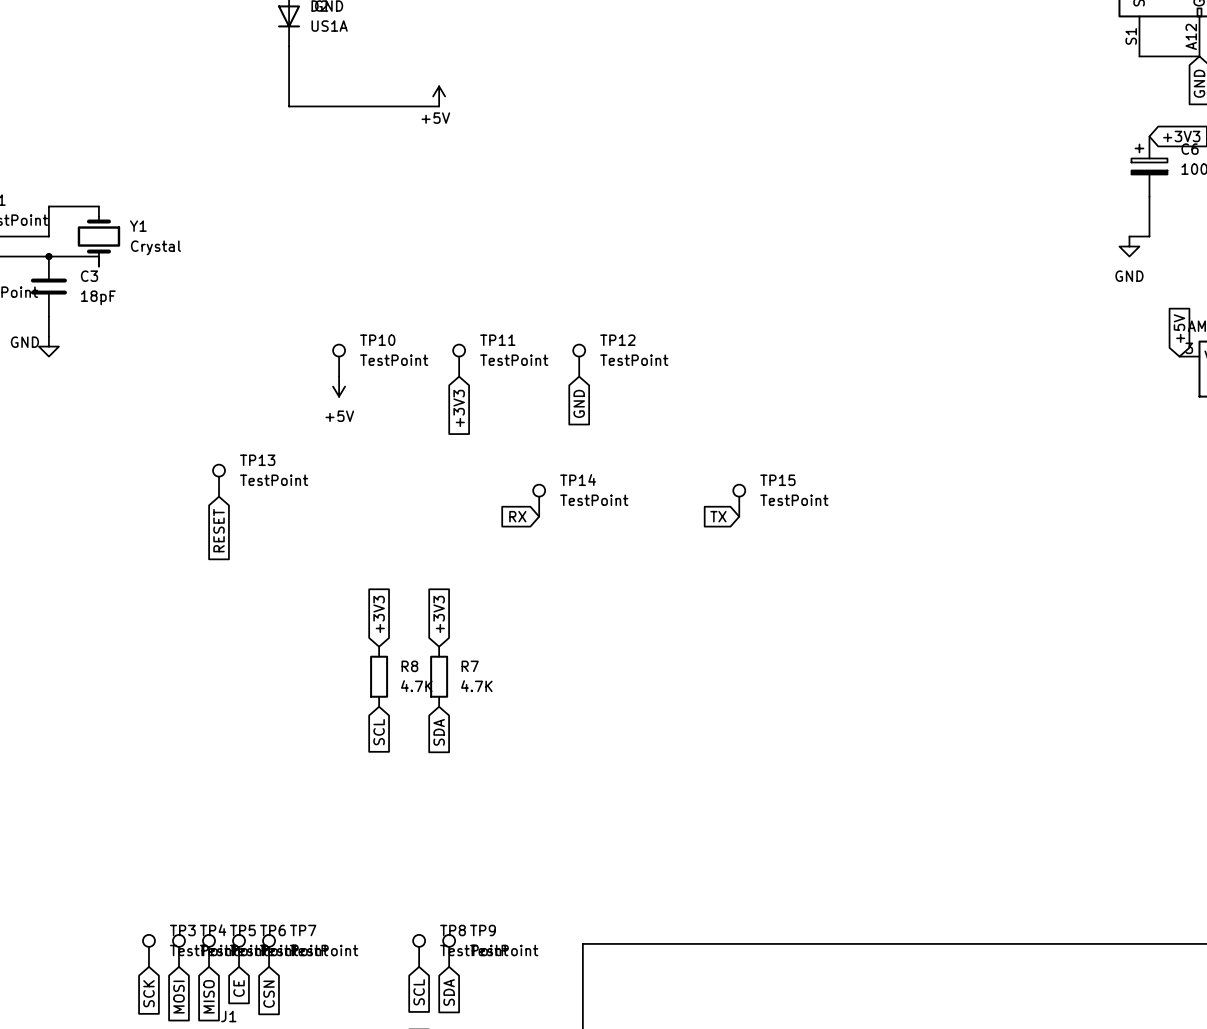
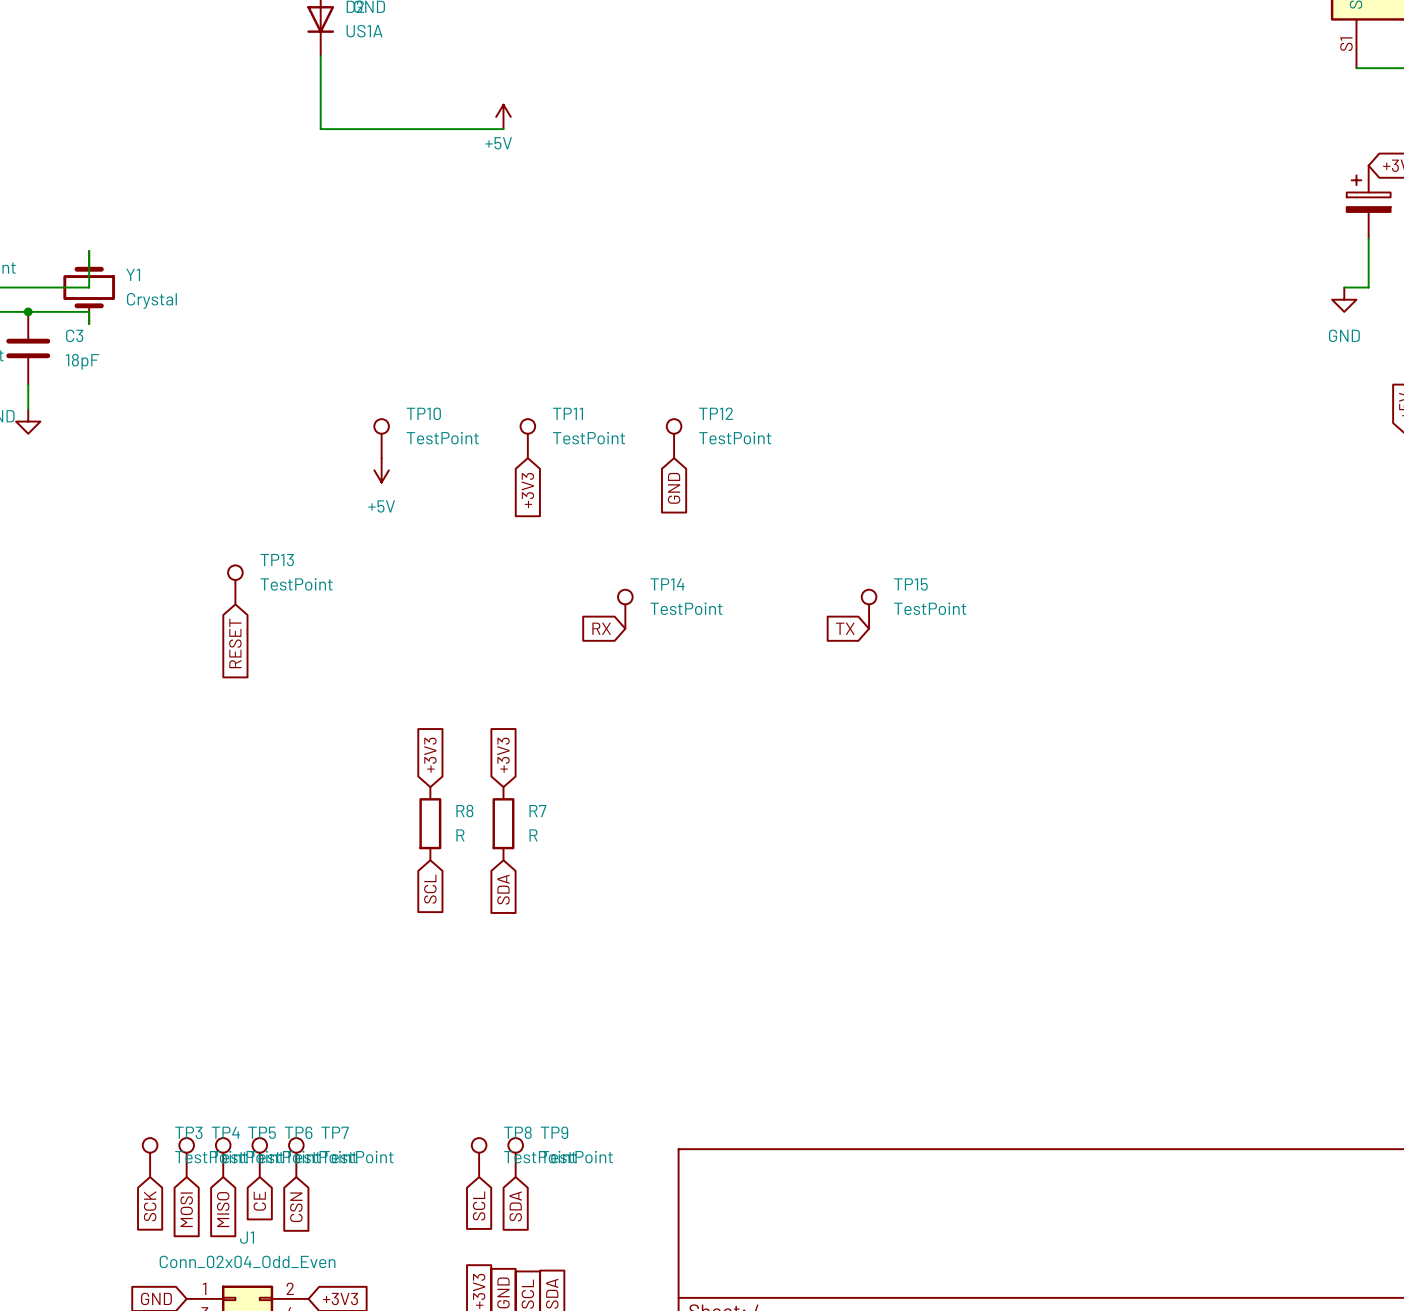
wire: (98, 206) (48, 206) (48, 236) -> (89, 250) (89, 287) (28, 287)
R8 value: 4.7K (416, 686) -> R (460, 835)
R7 value: 4.7K (476, 686) -> R (533, 835)

